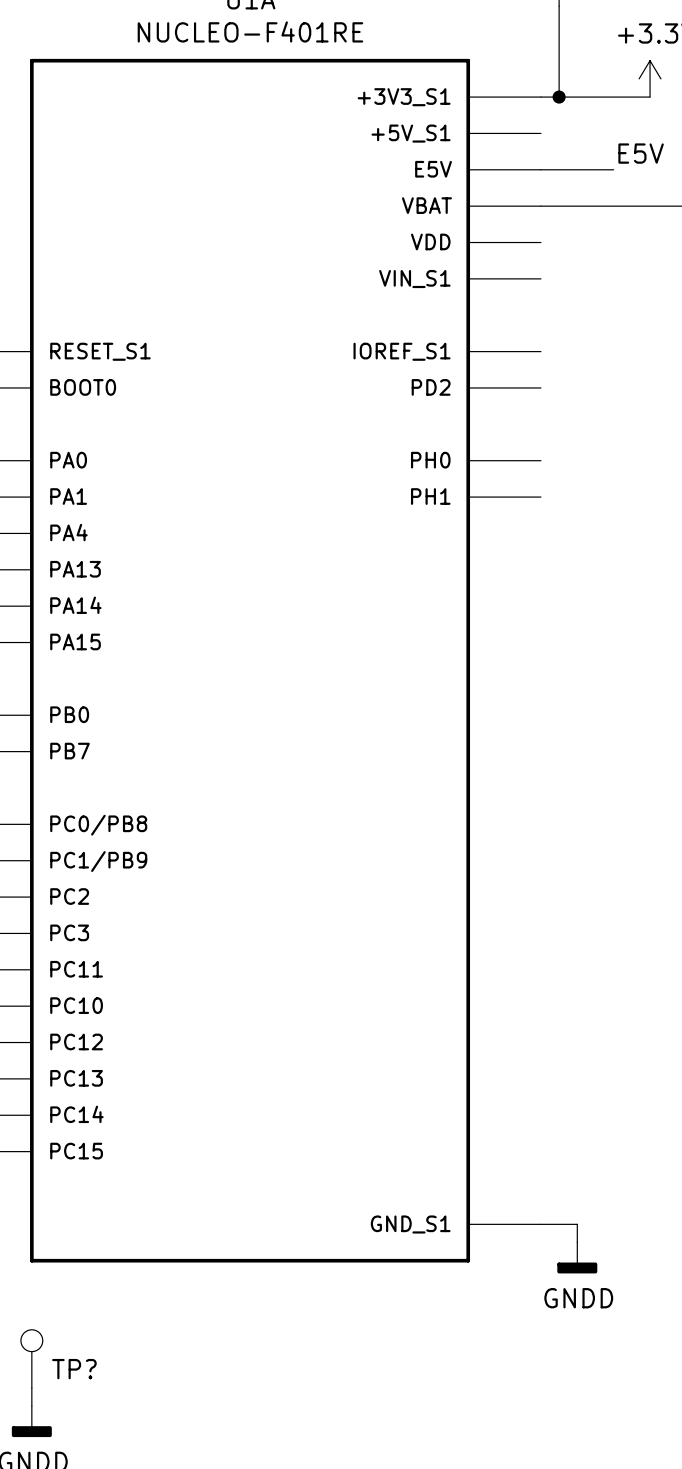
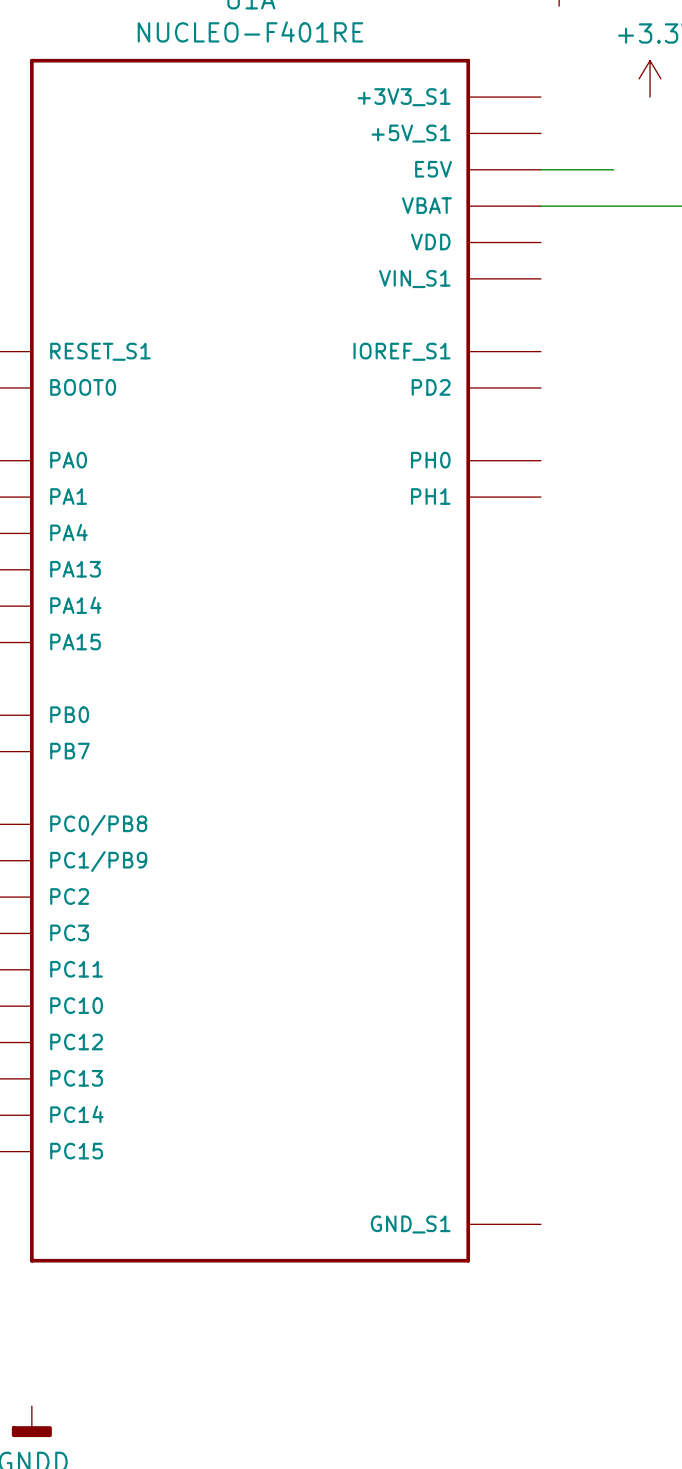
wire: (559, 6) (559, 97) -> none
wire: (540, 97) (650, 97) -> none
junction: (559, 97) -> none
label: E5V (641, 153) -> none
wire: (540, 1224) (577, 1224) (577, 1242) -> none
power symbol: GNDD (577, 1257) -> none
TP?: (31, 1358) -> none
wire: (31, 1387) (31, 1406) -> none

